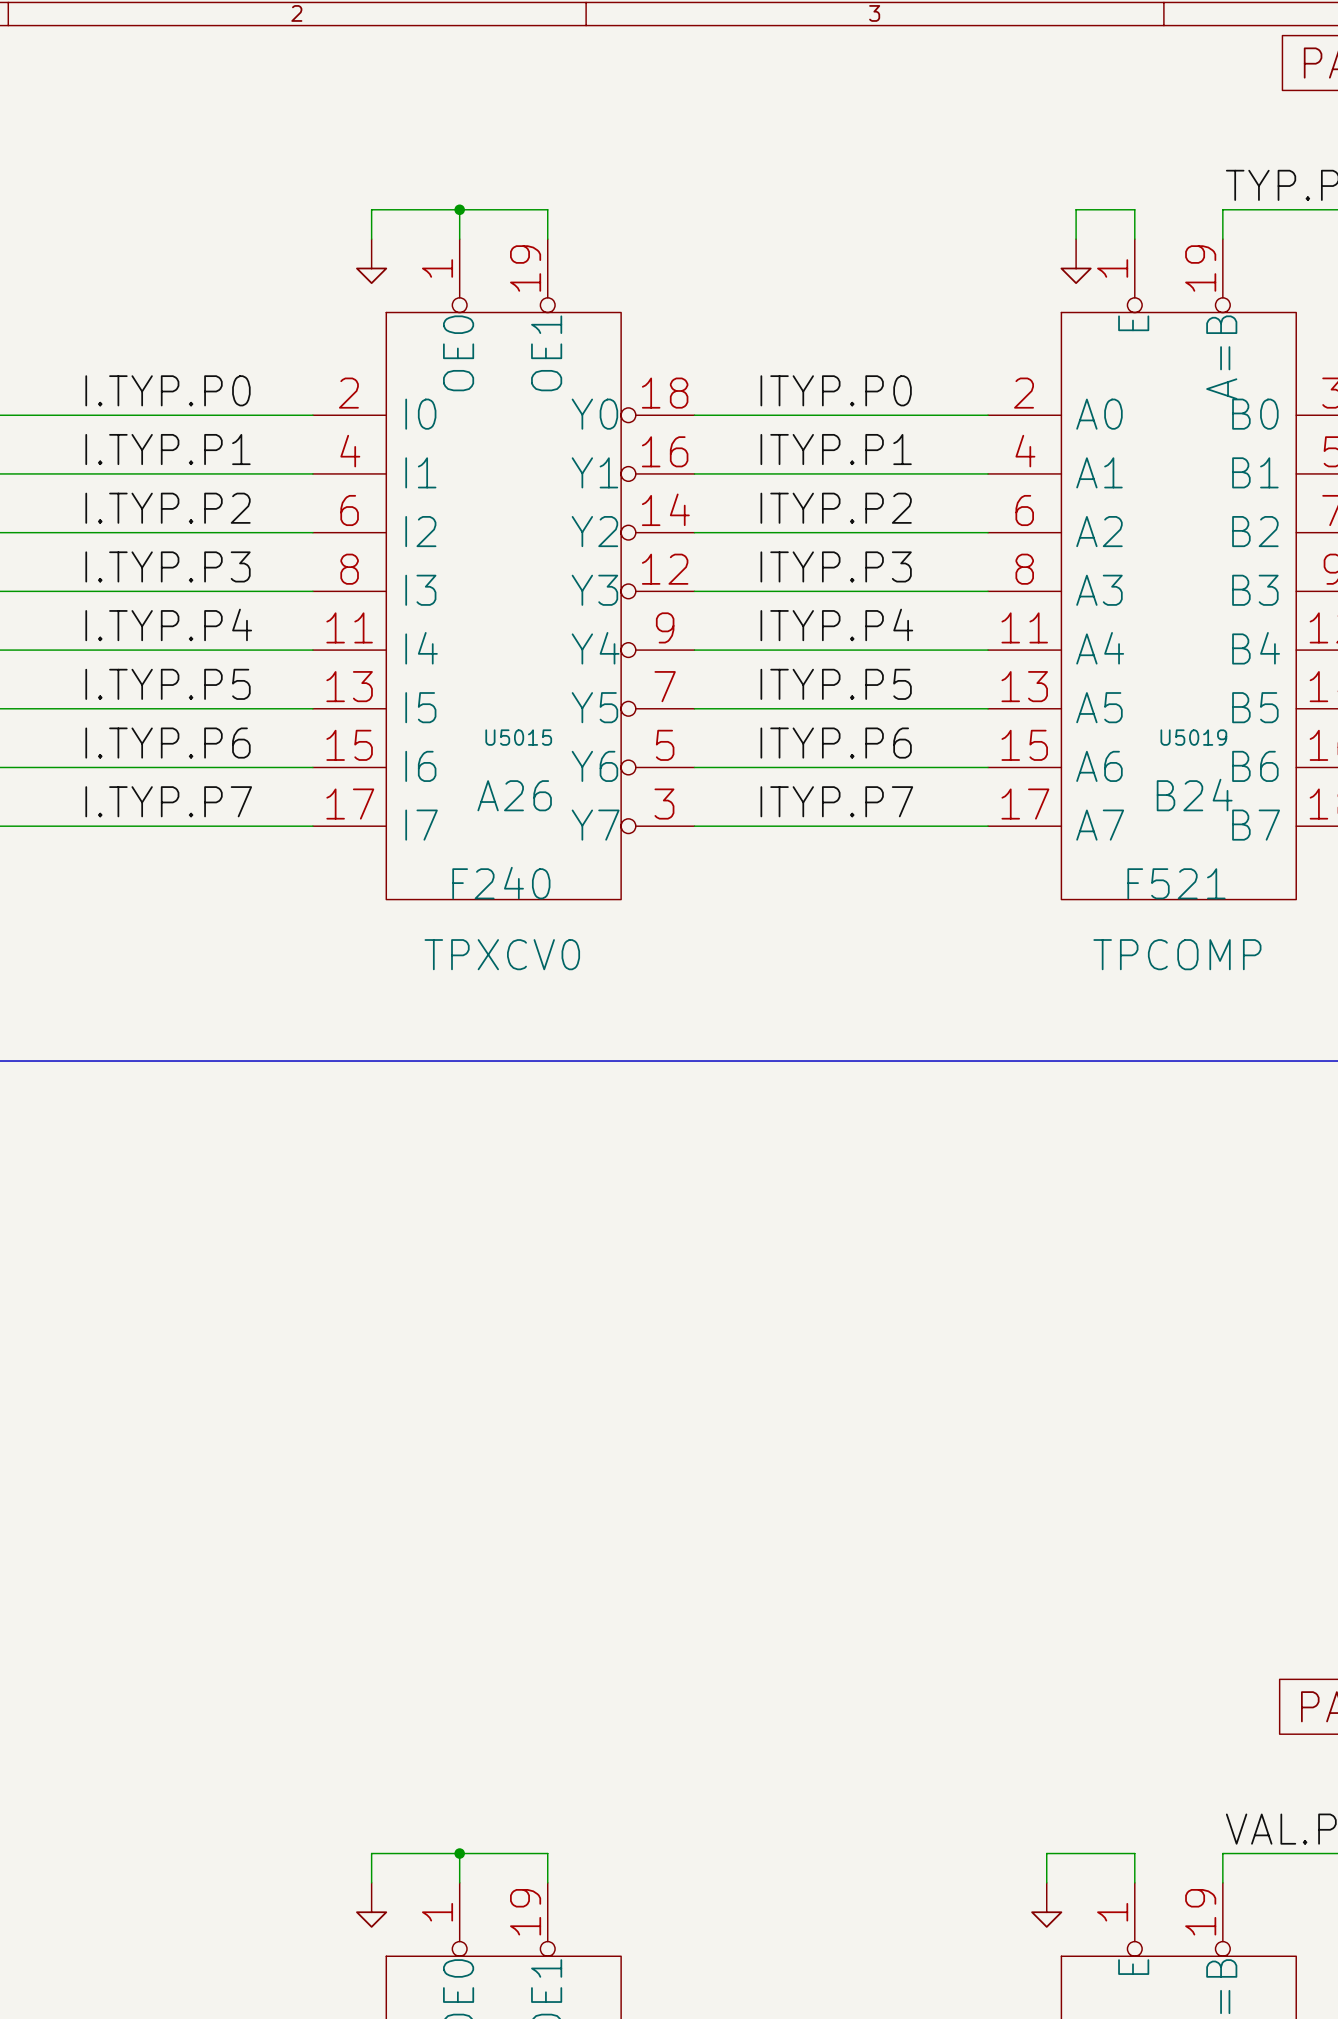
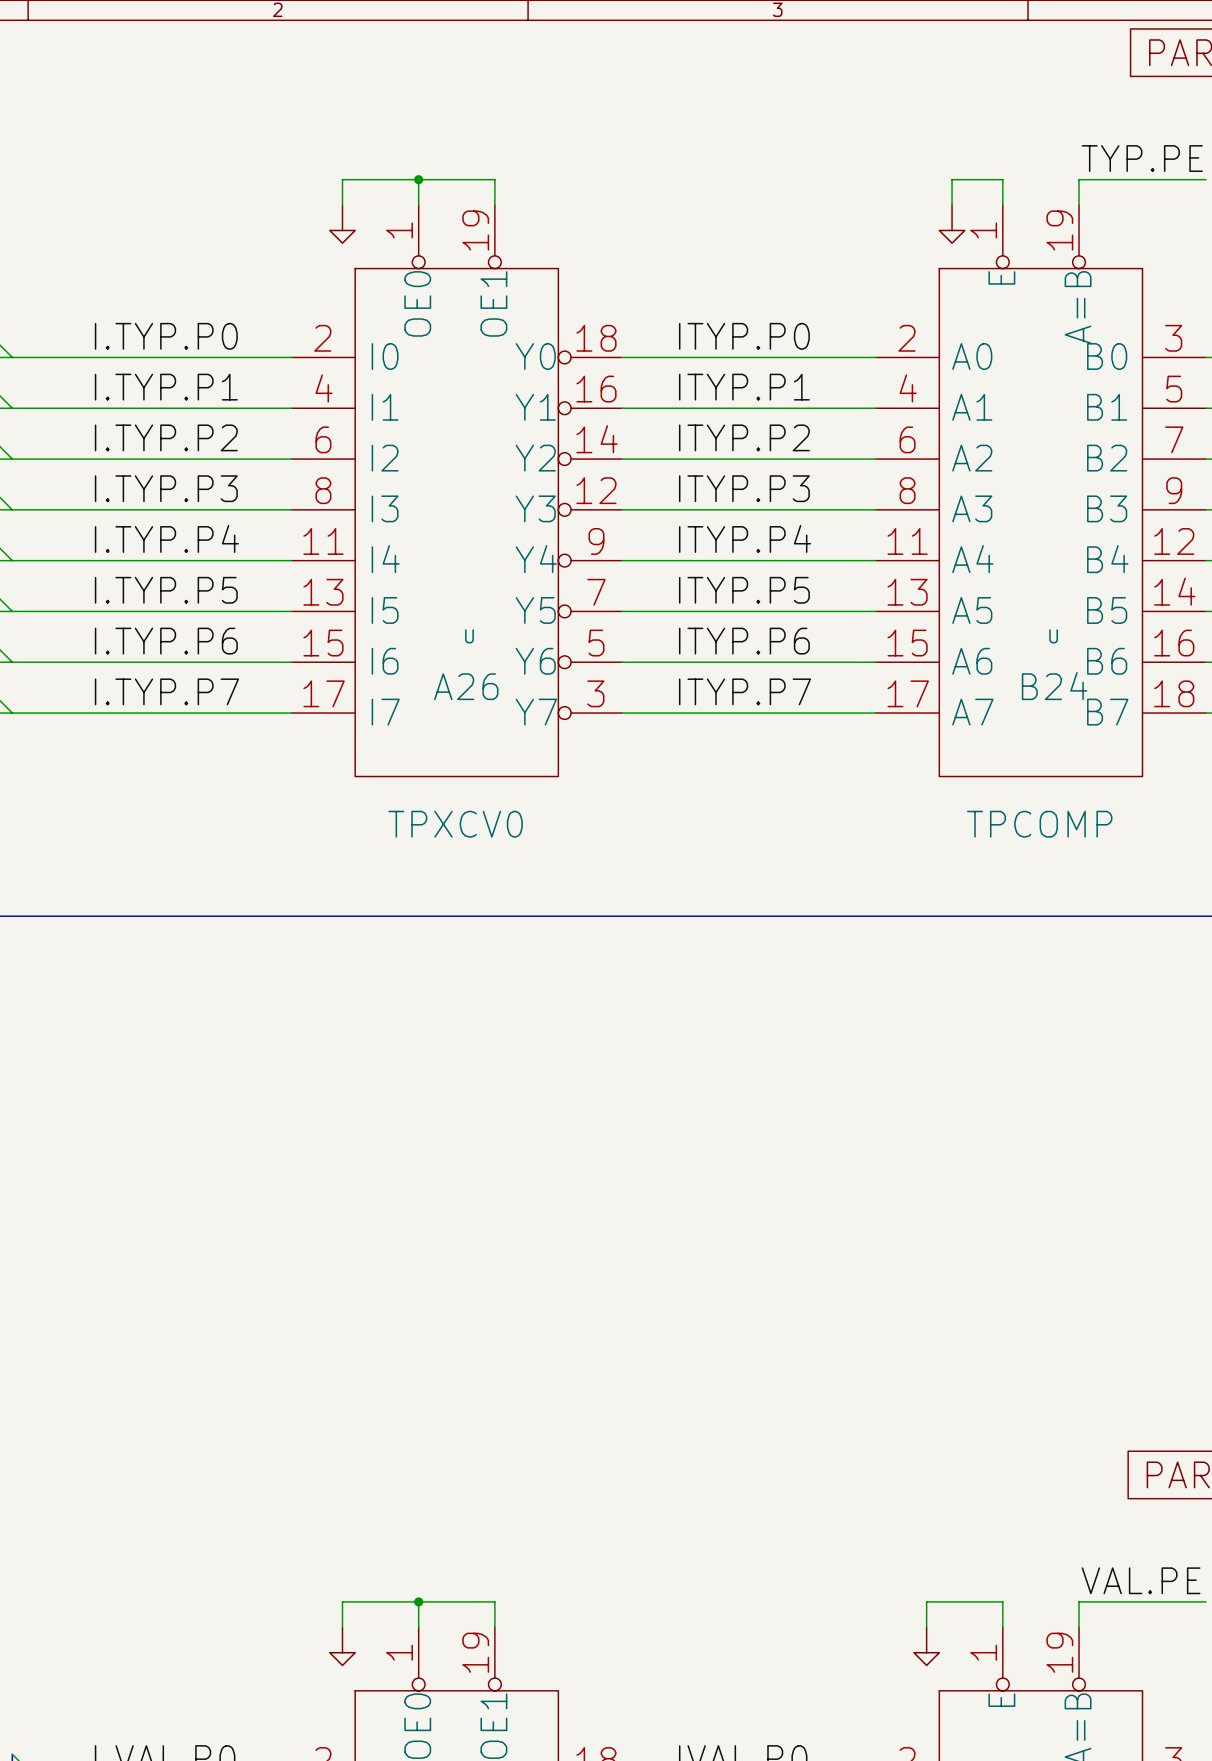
U5015 name: U5015 (518, 737) -> U (469, 636)
U5019 name: U5019 (1193, 737) -> U (1053, 636)
U5015 value: F240 (501, 883) -> none
U5019 value: F521 (1176, 883) -> none

